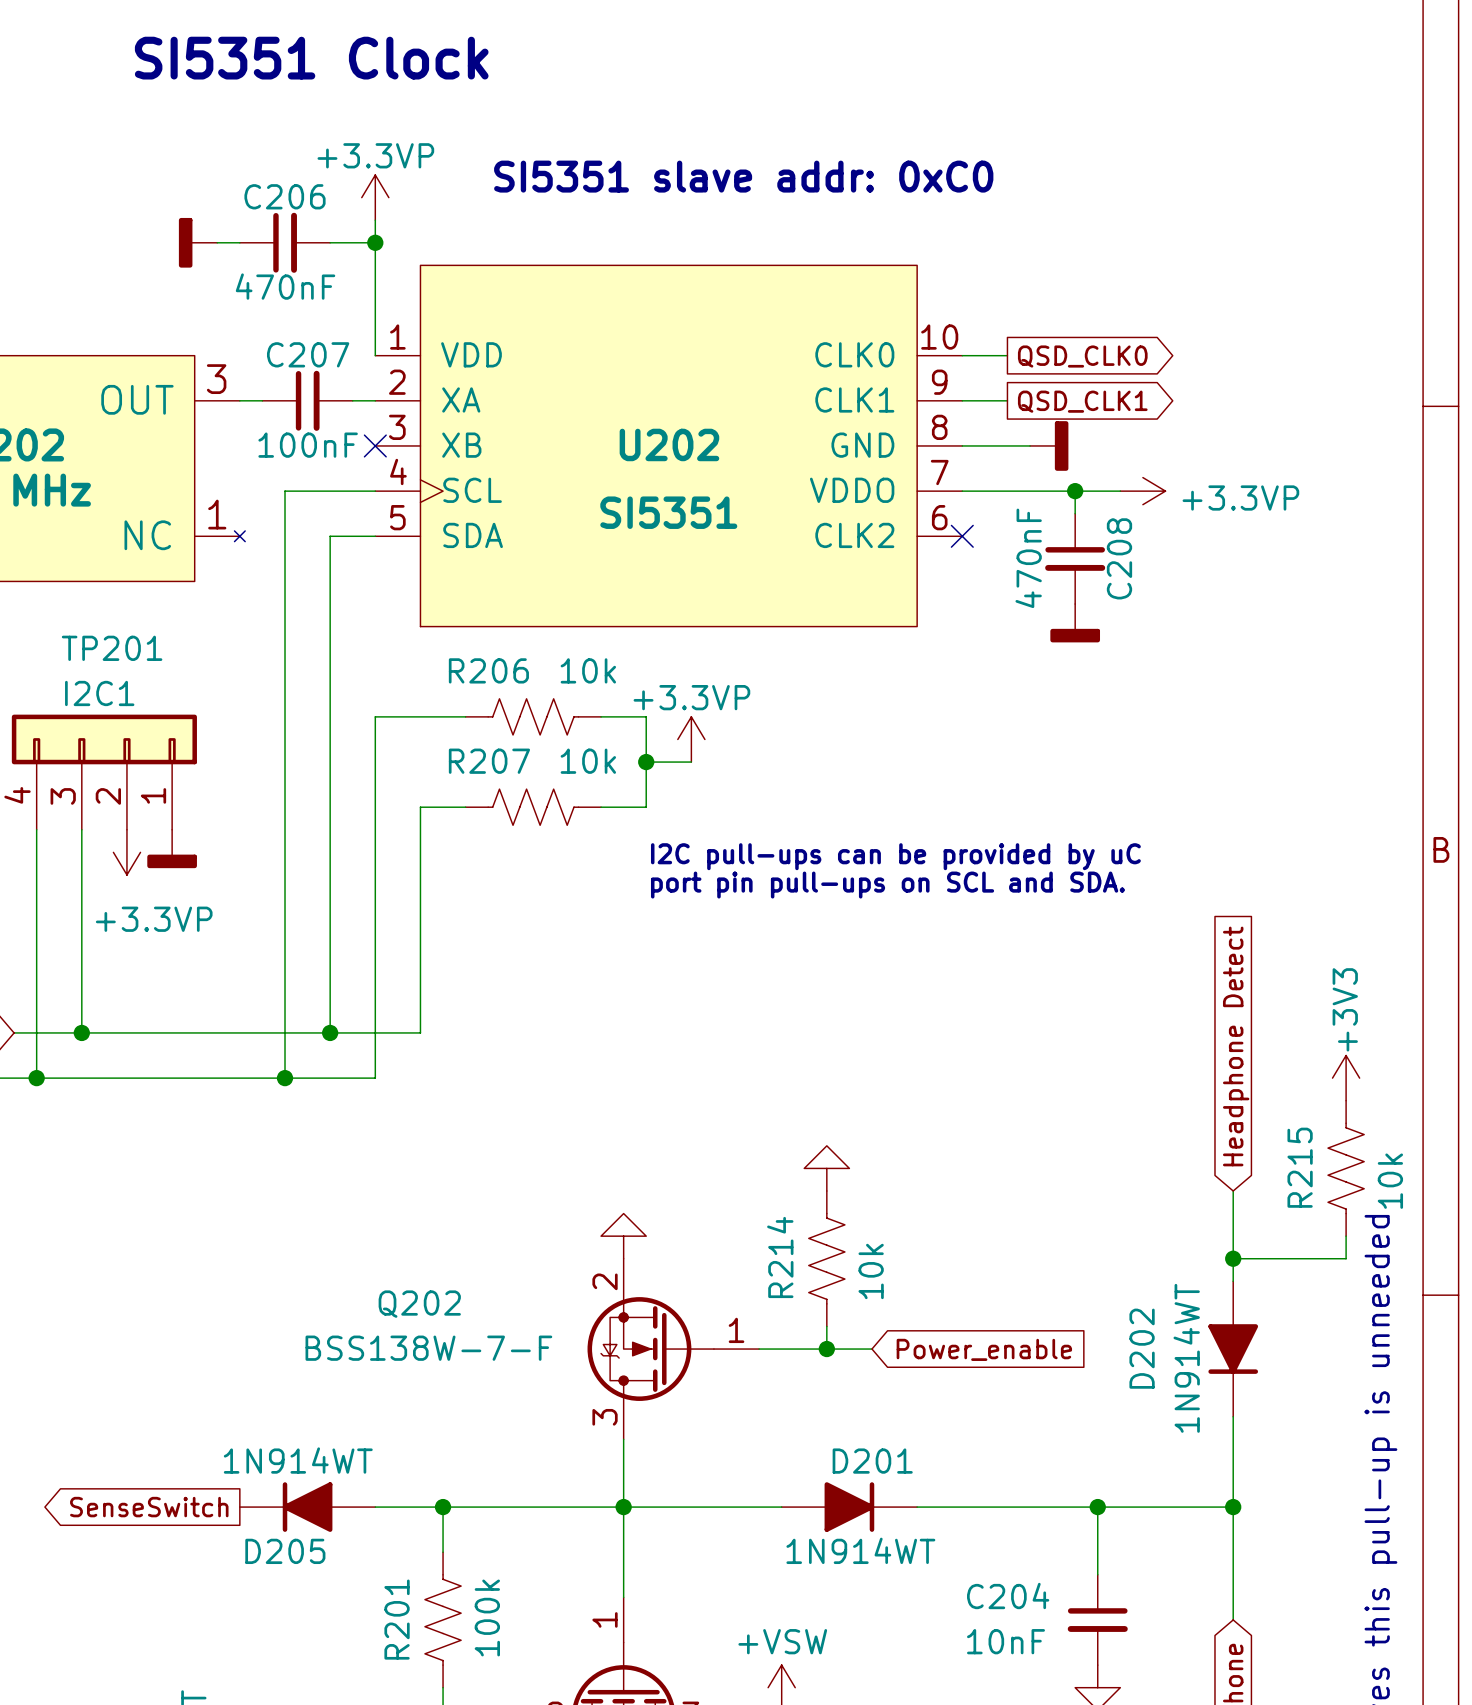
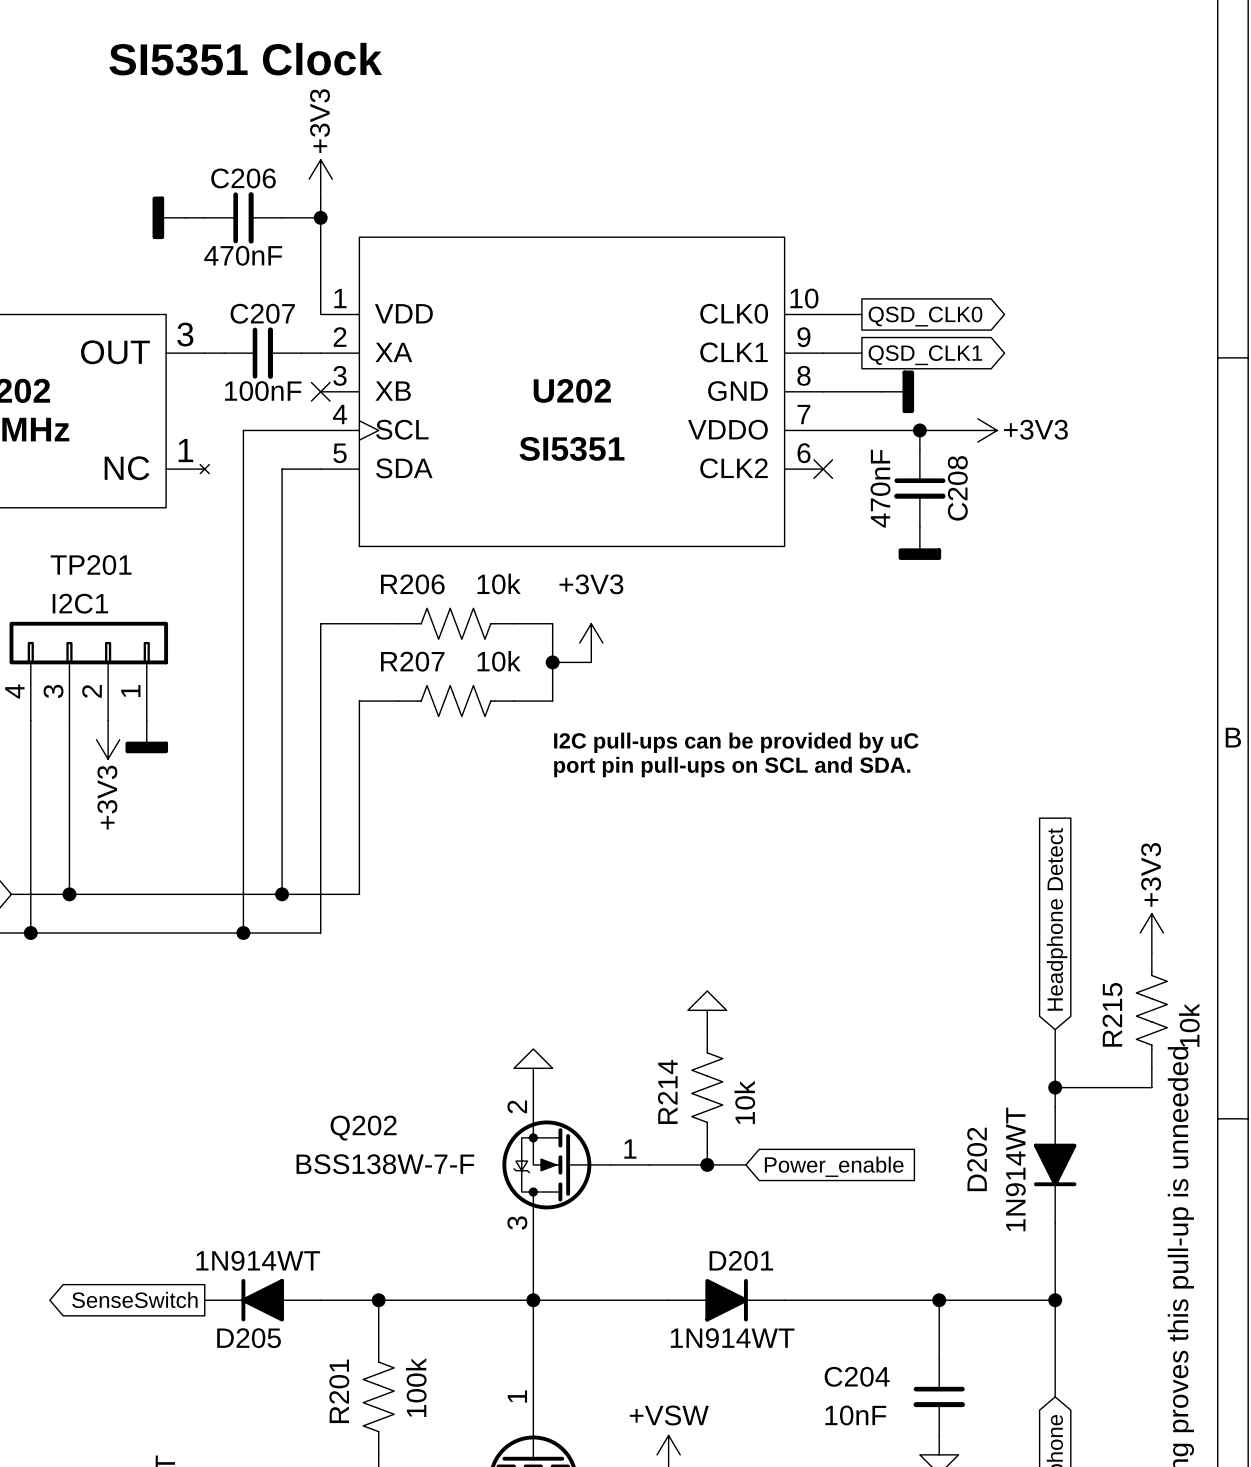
text: SI5351 slave addr: 0xC0 (743, 176) -> none
power symbol: +3.3VP (375, 197) -> +3V3 (320, 179)
power symbol: +3.3VP (1142, 491) -> +3V3 (977, 430)
power symbol: +3.3VP (691, 739) -> +3V3 (591, 643)
power symbol: +3.3VP (126, 852) -> +3V3 (108, 739)

